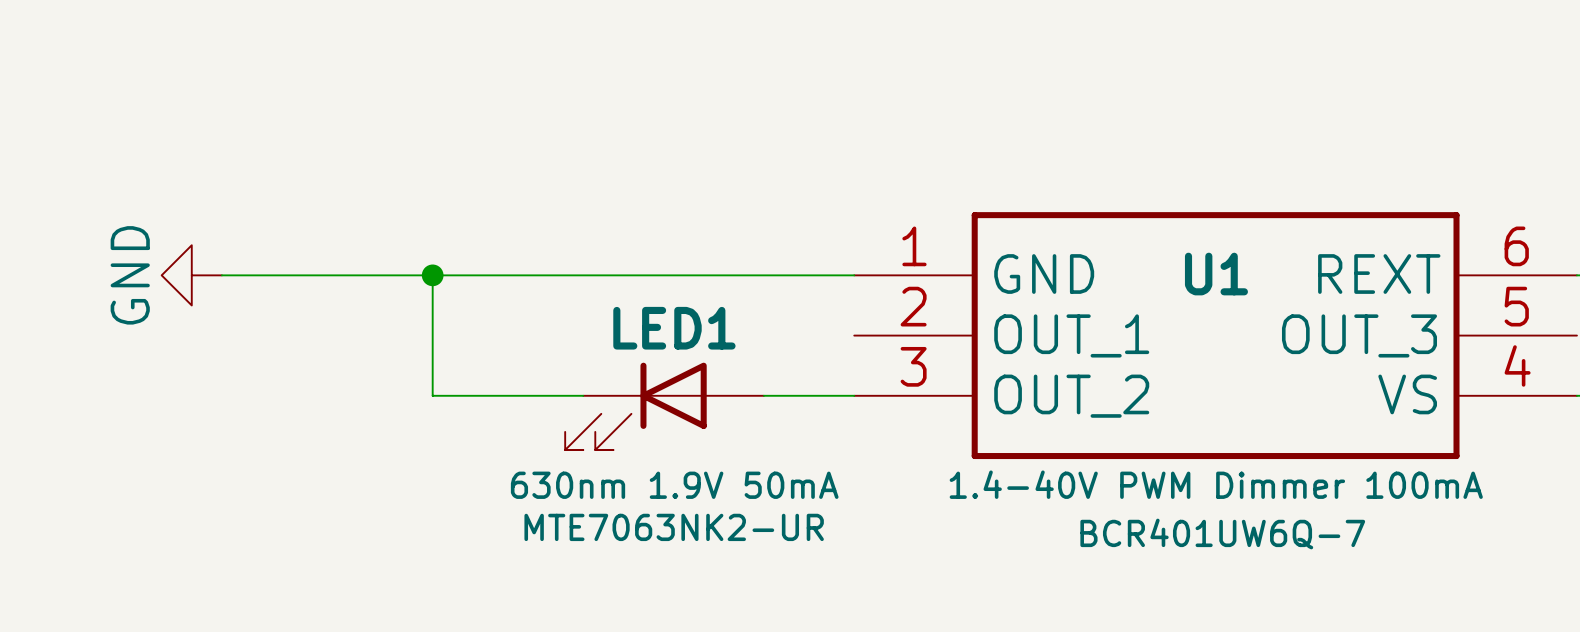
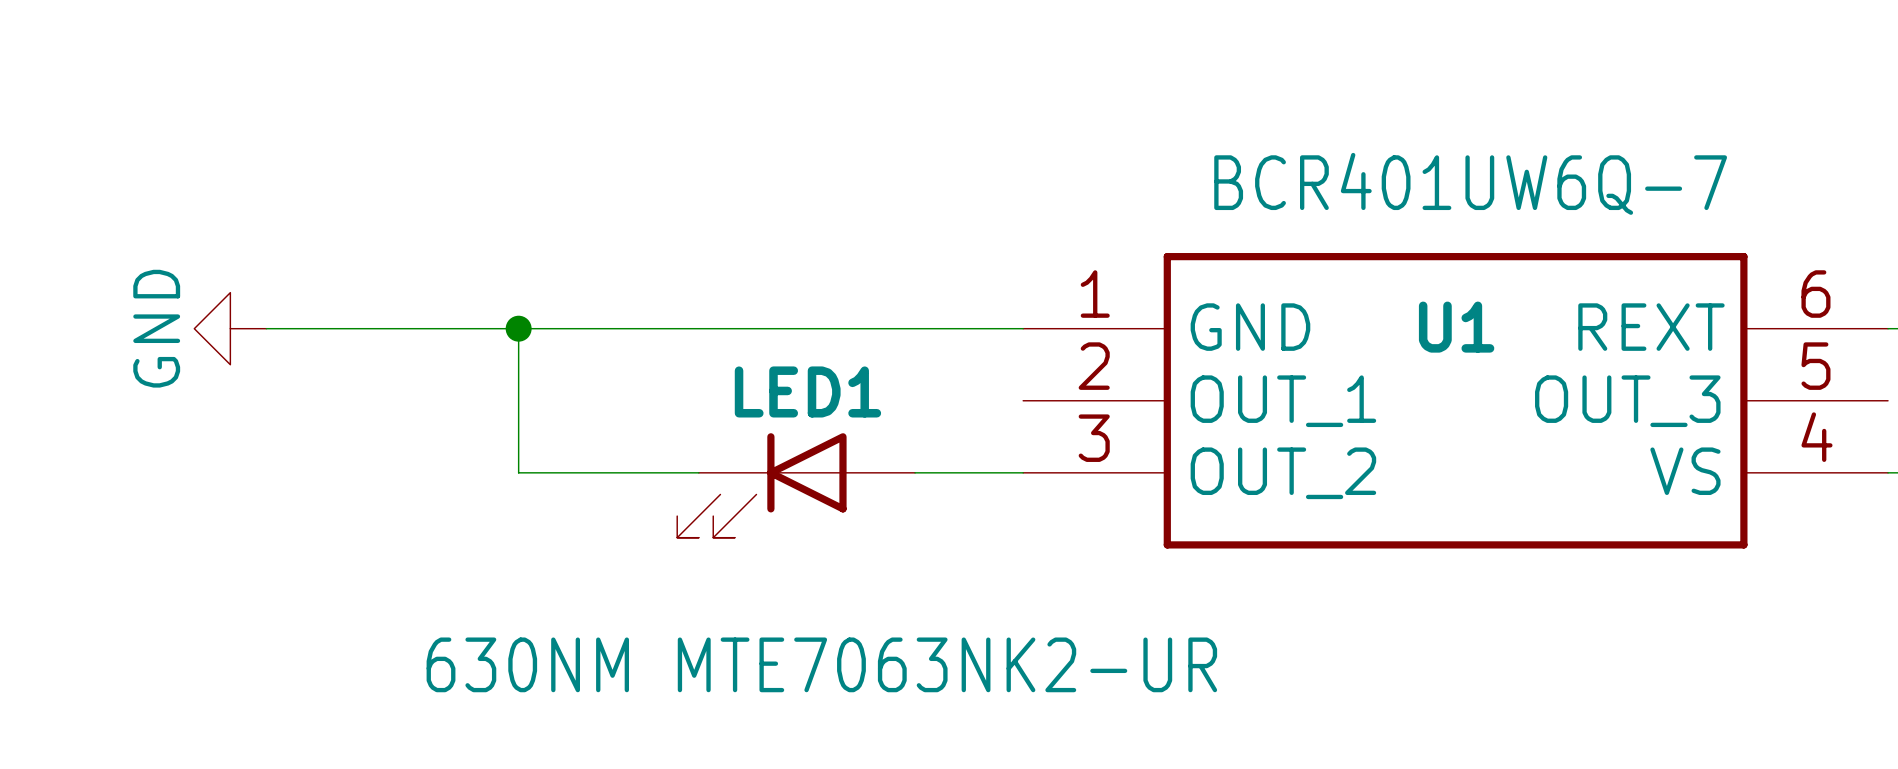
U1 value: 1.4-40V PWM Dimmer 100mA (1216, 484) -> BCR401UW6Q-7 (1470, 183)
LED1 value: 630nm 1.9V 50mA (674, 485) -> 630NM MTE7063NK2-UR (821, 664)
LED1 text: MTE7063NK2-UR (674, 527) -> none
U1 text: BCR401UW6Q-7 (1222, 534) -> none

